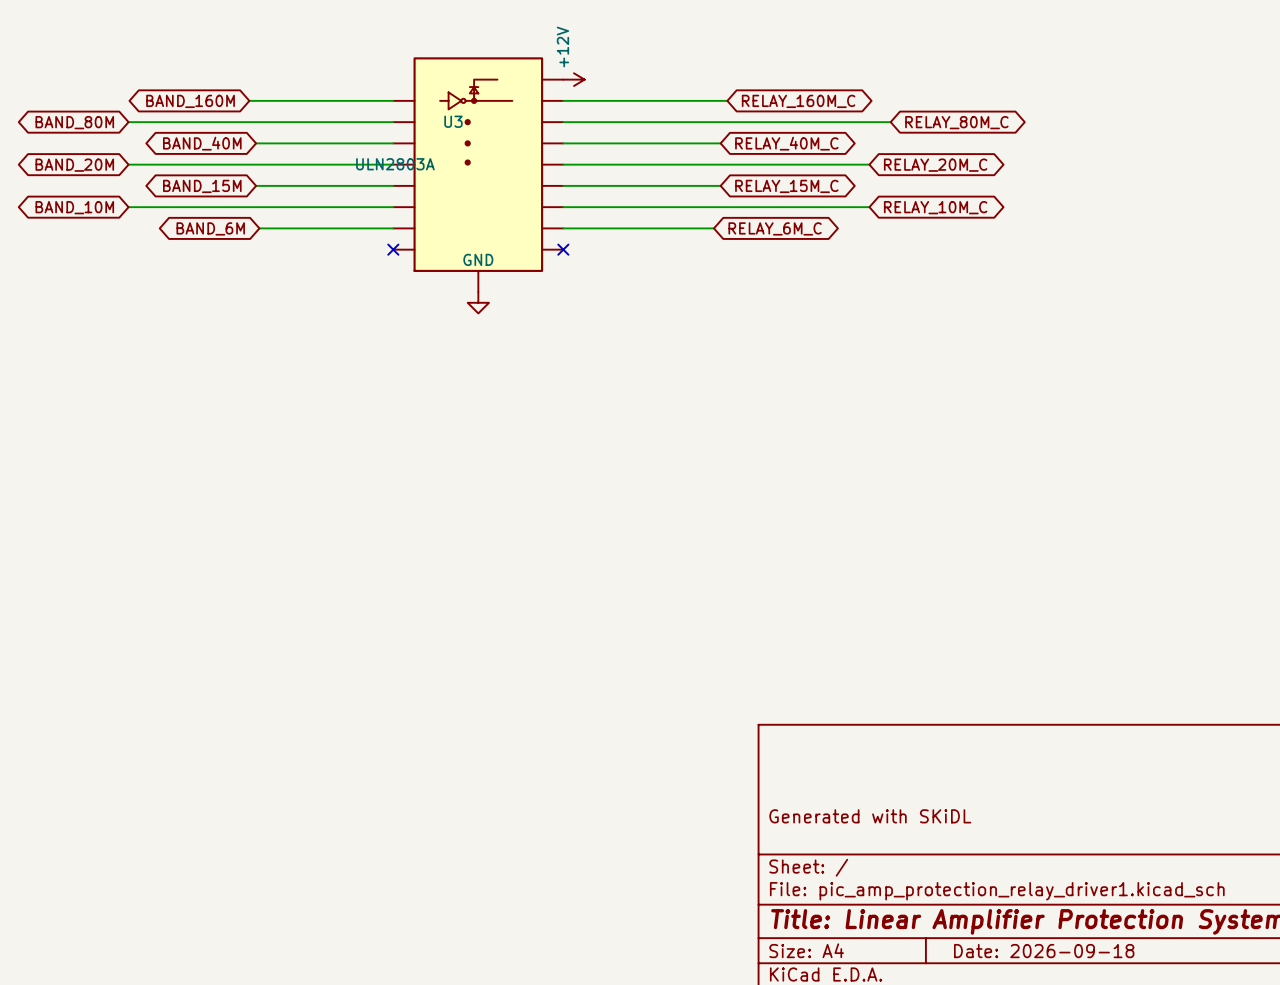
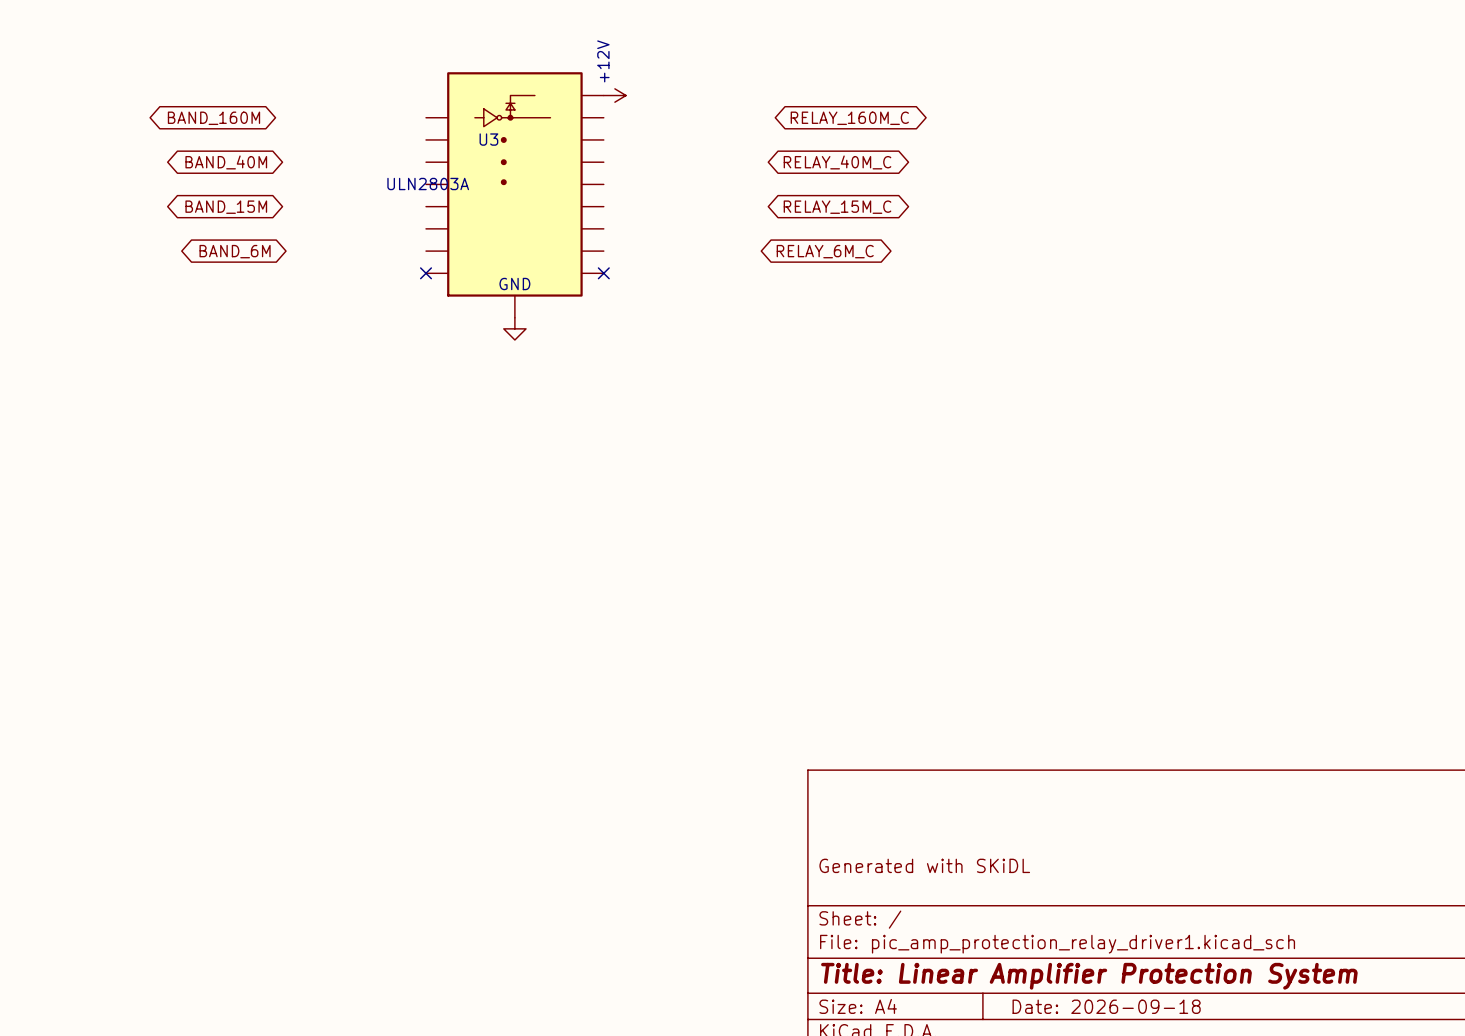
wire: (249, 100) (393, 100) -> none
wire: (563, 100) (727, 100) -> none
global label: BAND_80M (74, 122) -> none
wire: (128, 122) (393, 122) -> none
wire: (563, 122) (890, 122) -> none
global label: RELAY_80M_C (956, 122) -> none
wire: (256, 143) (393, 143) -> none
wire: (563, 143) (720, 143) -> none
wire: (128, 164) (393, 164) -> none
wire: (563, 164) (869, 164) -> none
global label: BAND_20M (74, 165) -> none
global label: RELAY_20M_C (935, 165) -> none
wire: (256, 185) (393, 185) -> none
wire: (563, 185) (720, 185) -> none
global label: BAND_10M (74, 207) -> none
wire: (128, 207) (393, 207) -> none
wire: (563, 207) (869, 207) -> none
global label: RELAY_10M_C (935, 207) -> none
wire: (259, 228) (393, 228) -> none
wire: (563, 228) (713, 228) -> none

